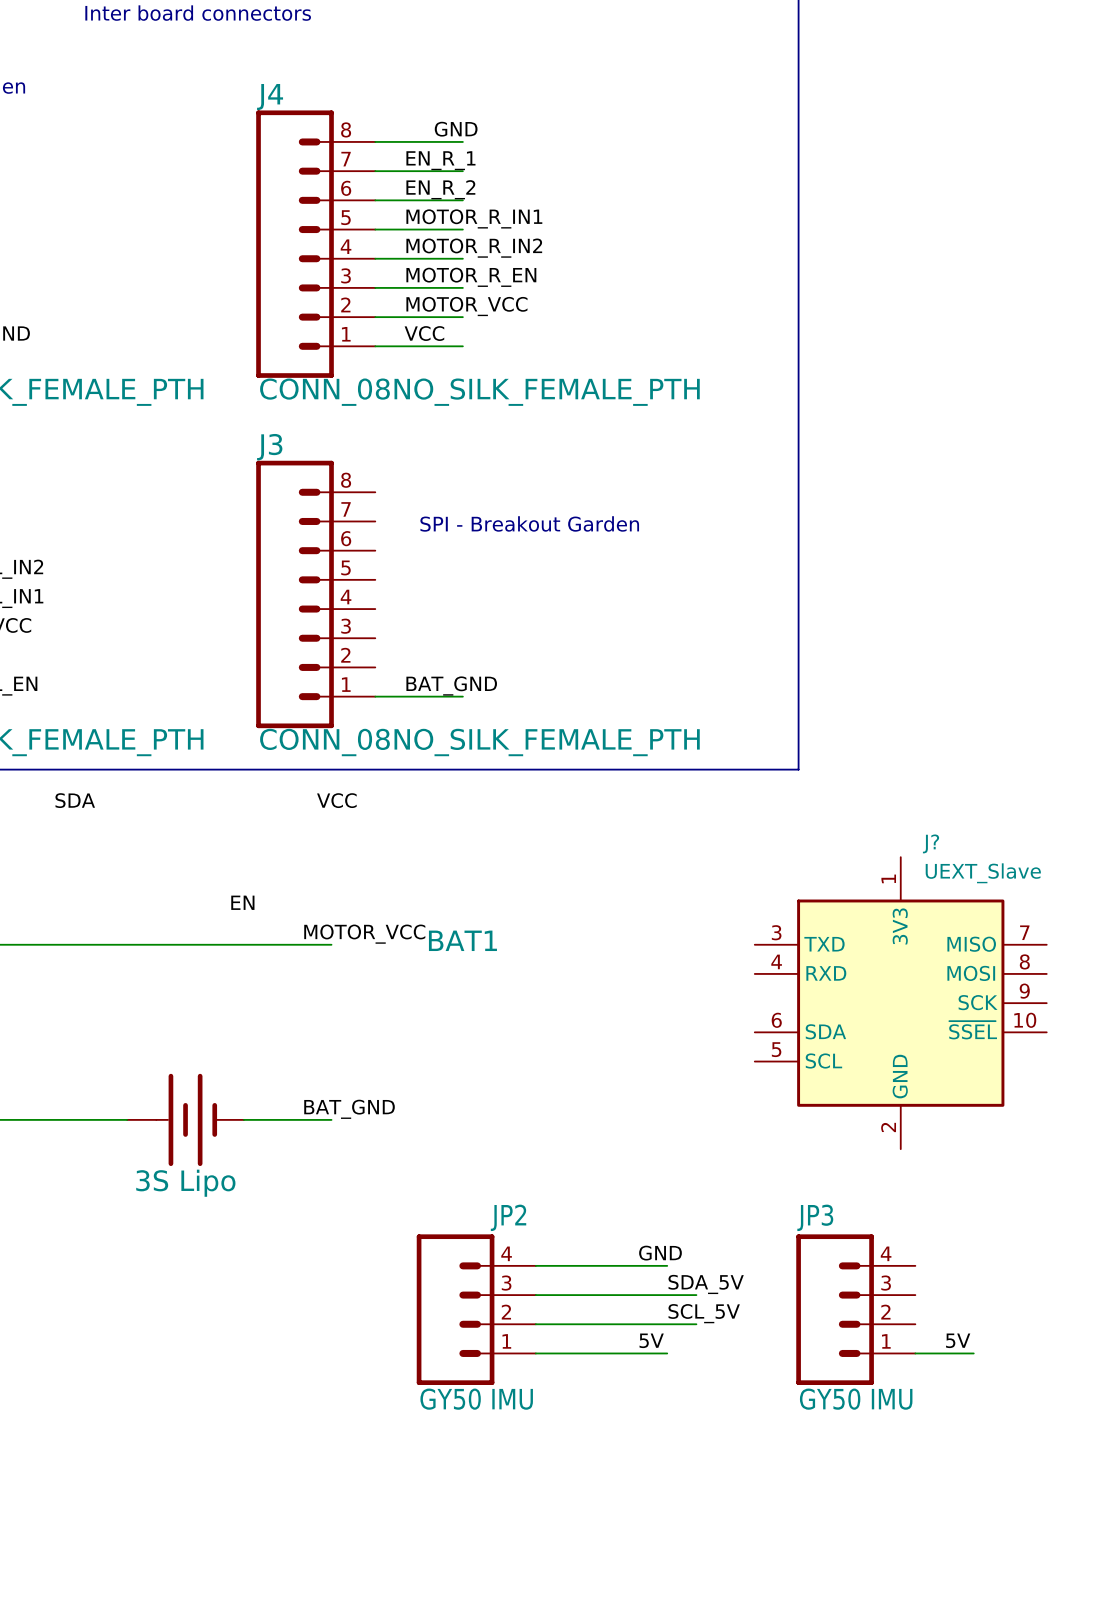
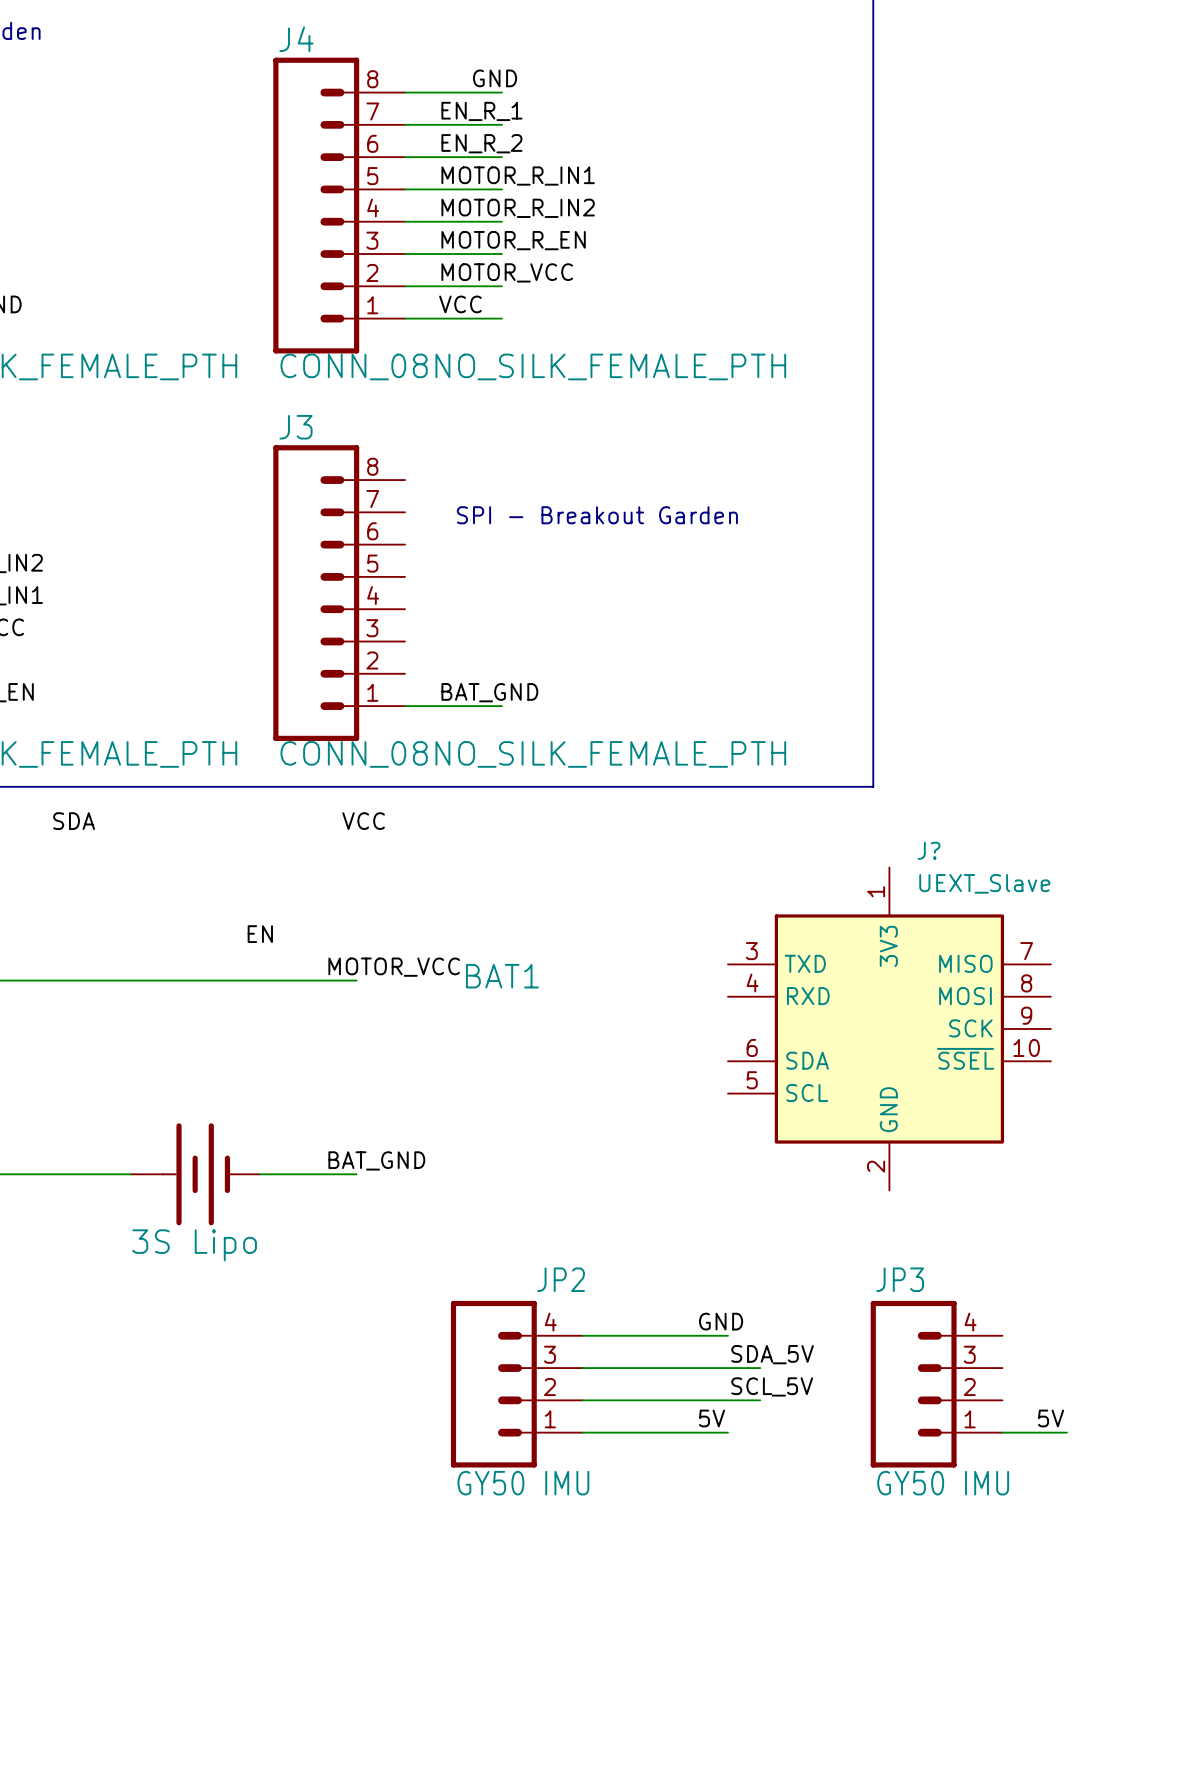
J? position: (900, 1003) -> (889, 1029)

